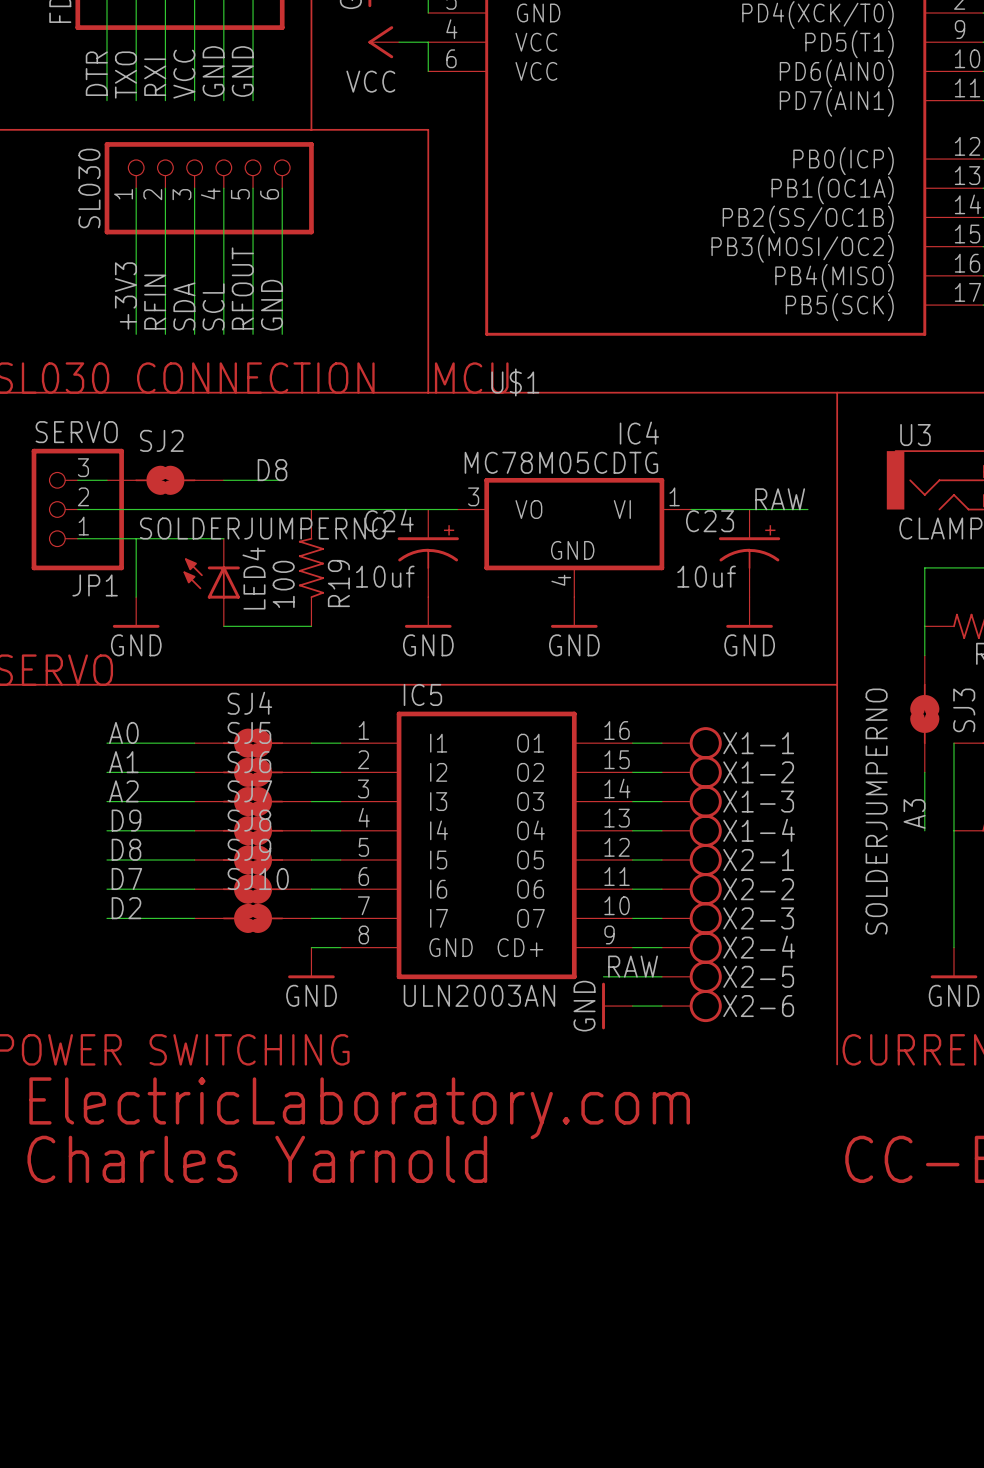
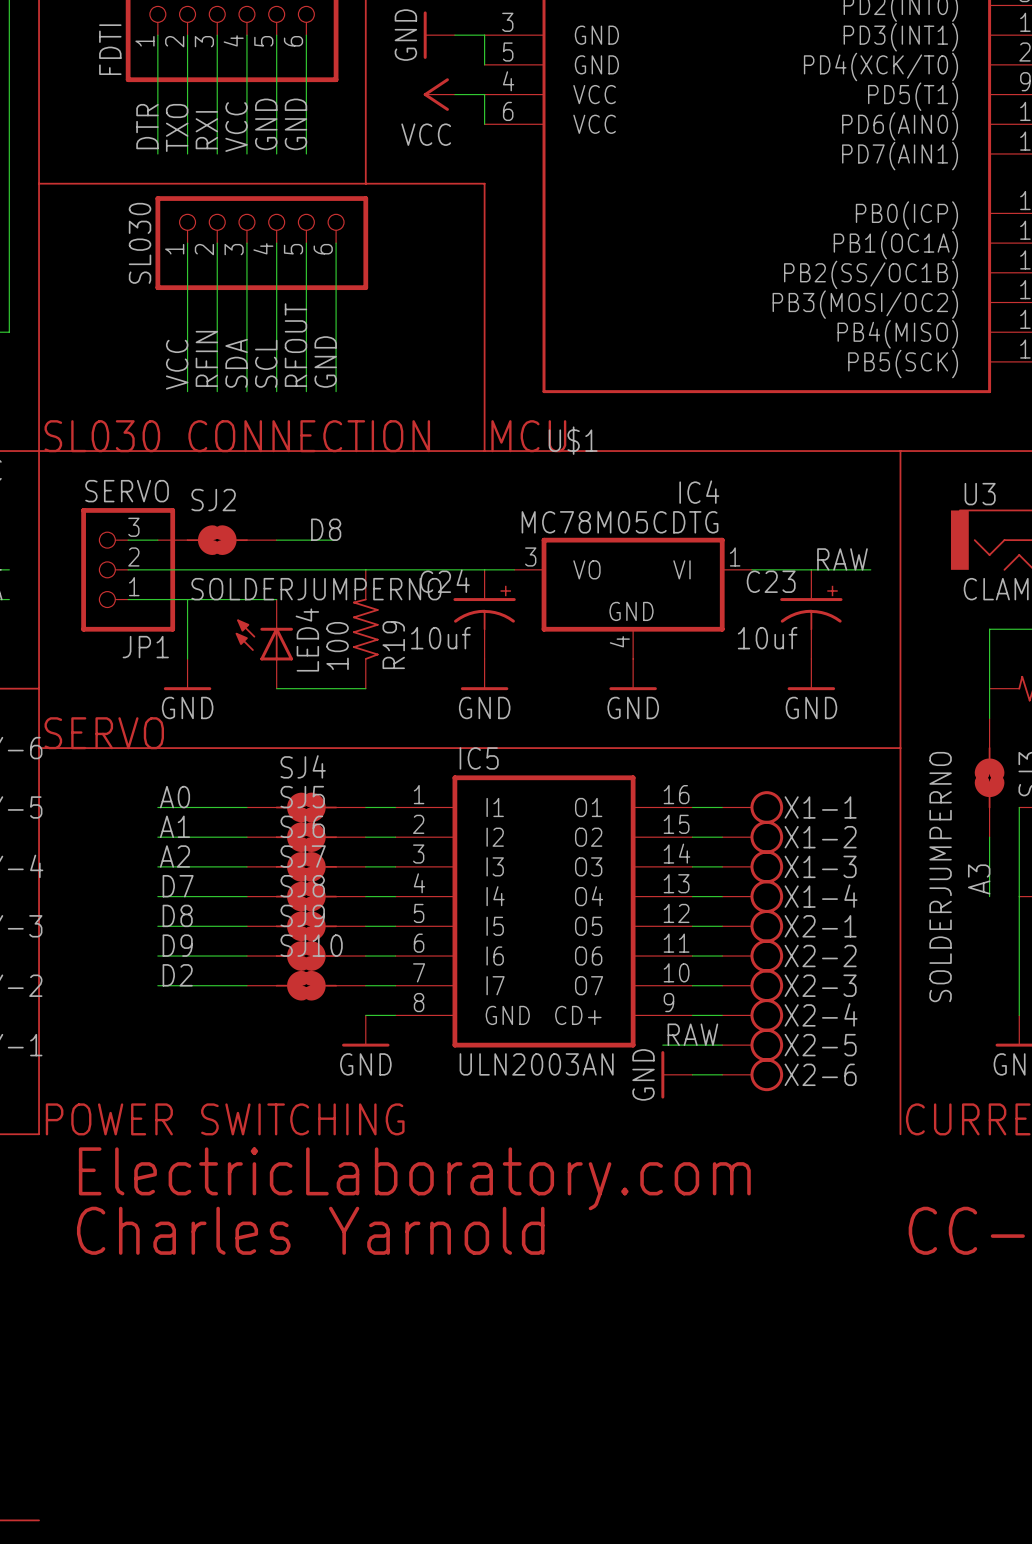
label: +3V3 (125, 295) -> VCC (177, 364)
label: D9 (126, 820) -> D7 (178, 886)
label: D7 (126, 878) -> D9 (177, 945)

